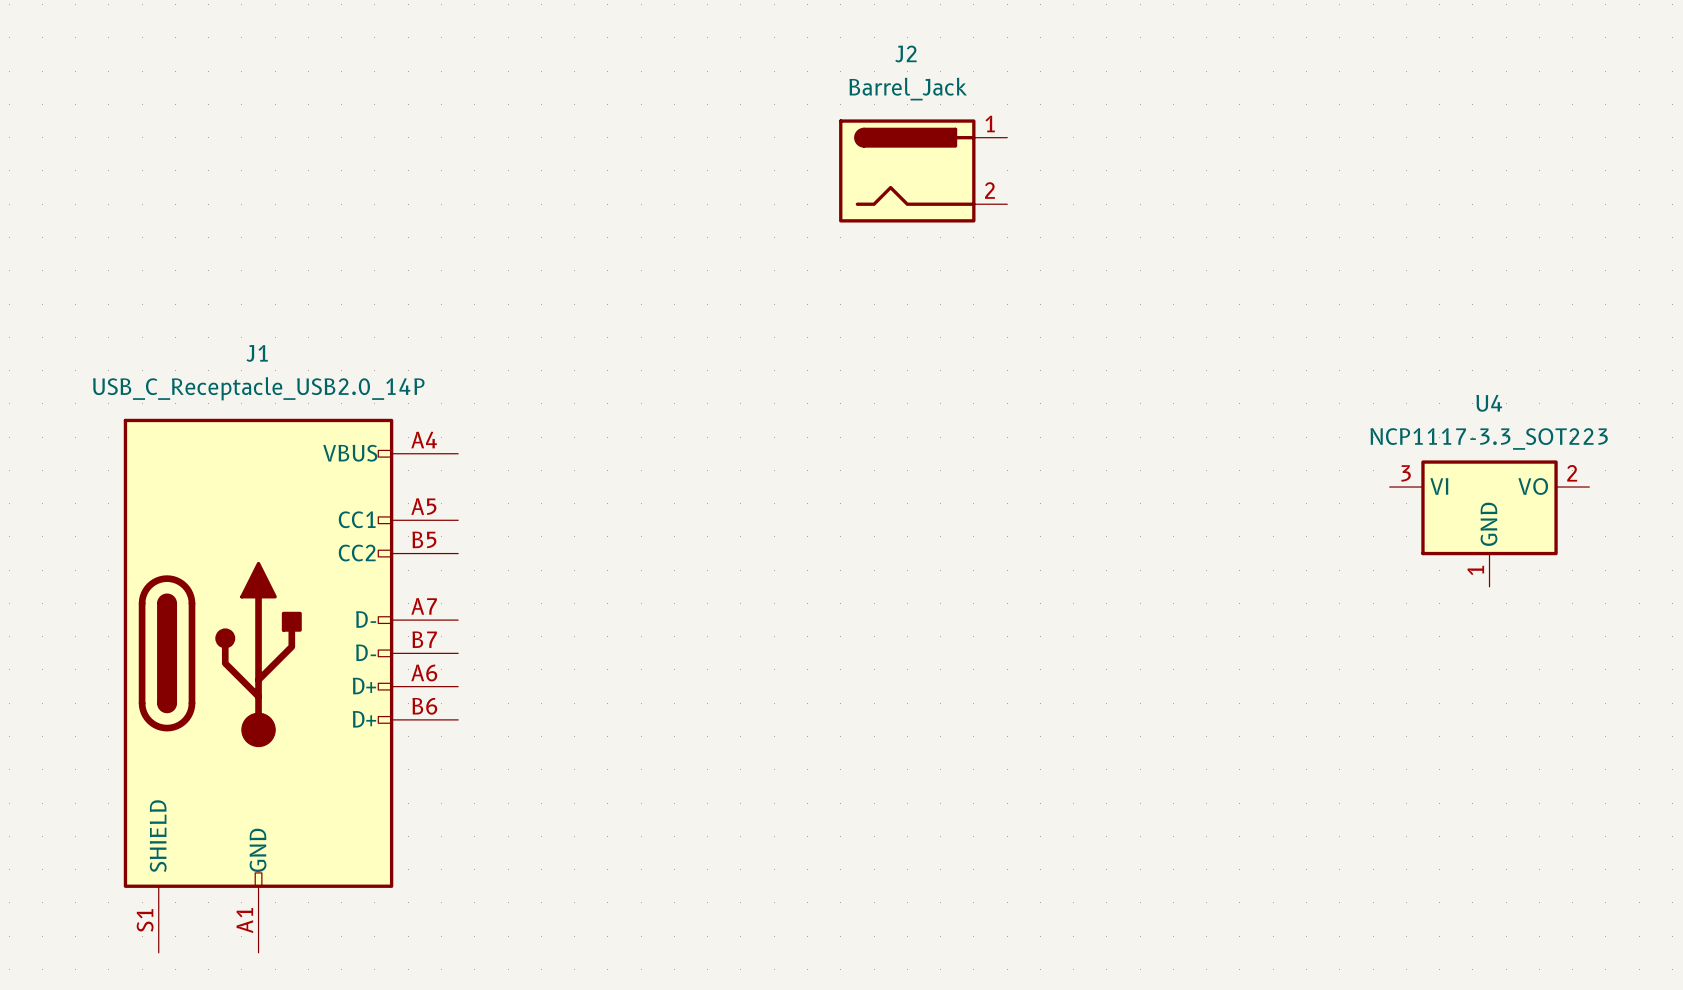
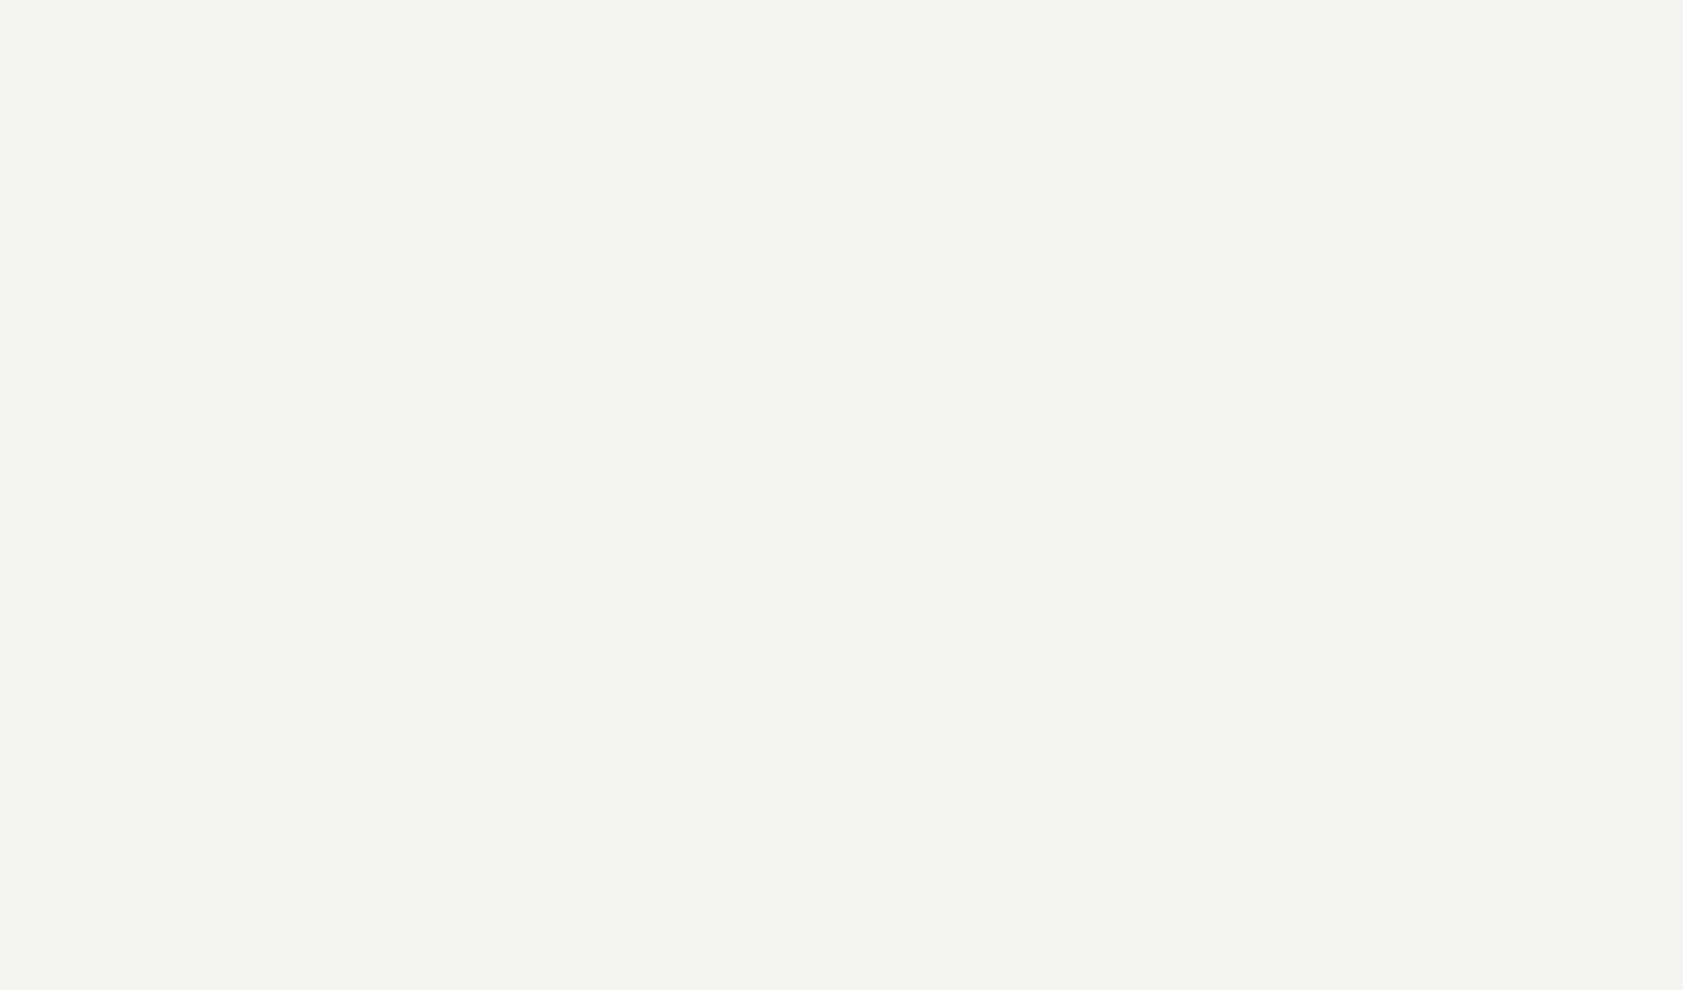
J2: Barrel_Jack (923, 170) -> none
U4: NCP1117-3.3_SOT223 (1489, 523) -> none
J1: USB_C_Receptacle_USB2.0_14P (290, 685) -> none

